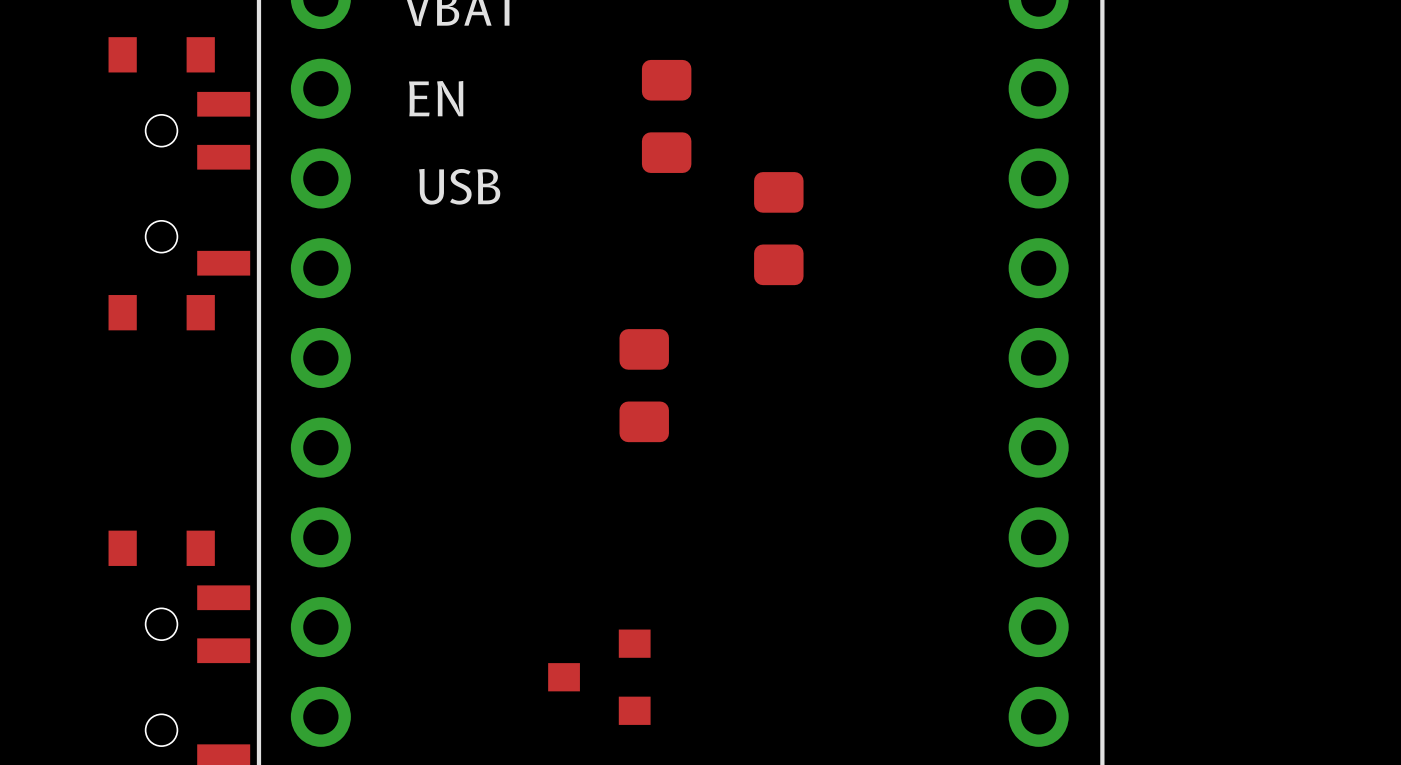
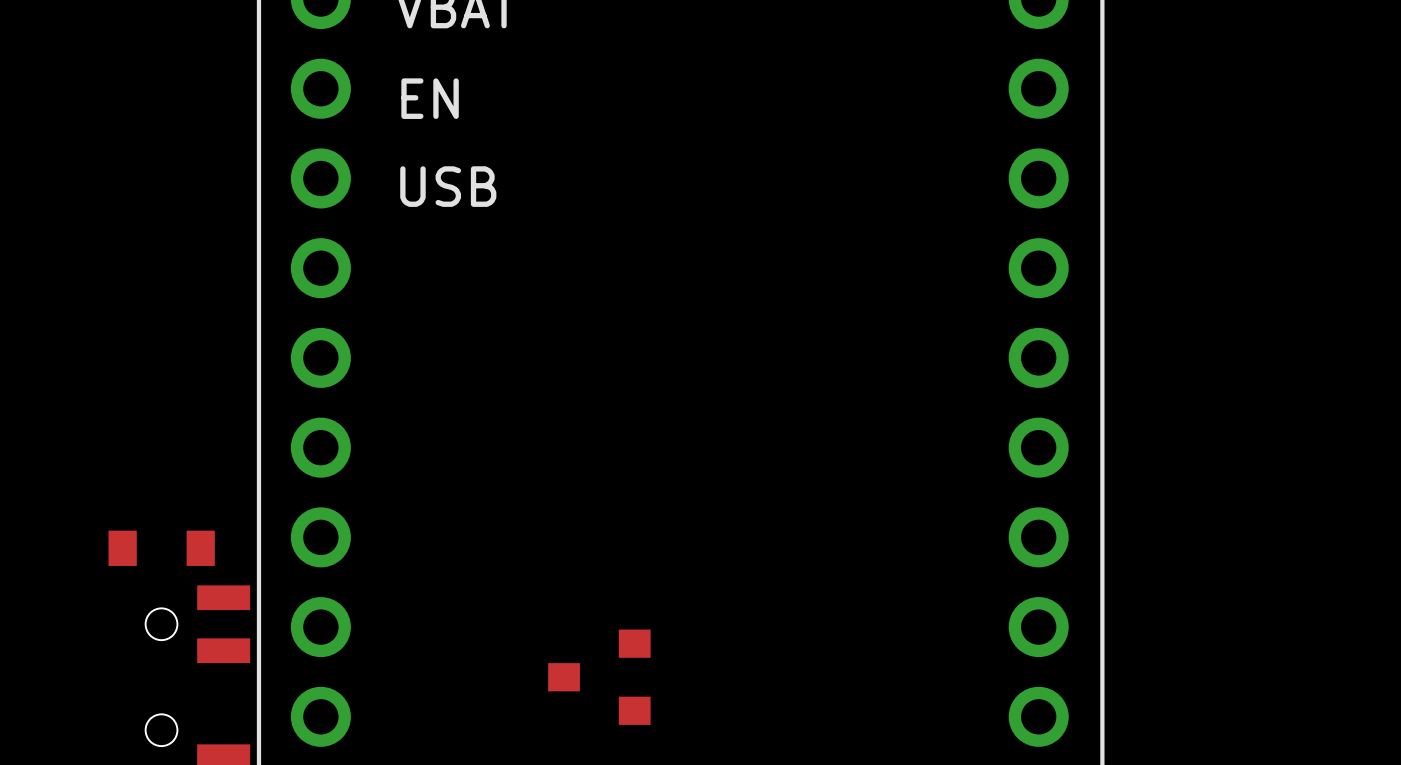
part: (666, 116) -> none
part: (179, 183) -> none
part: (778, 228) -> none
part: (644, 385) -> none

